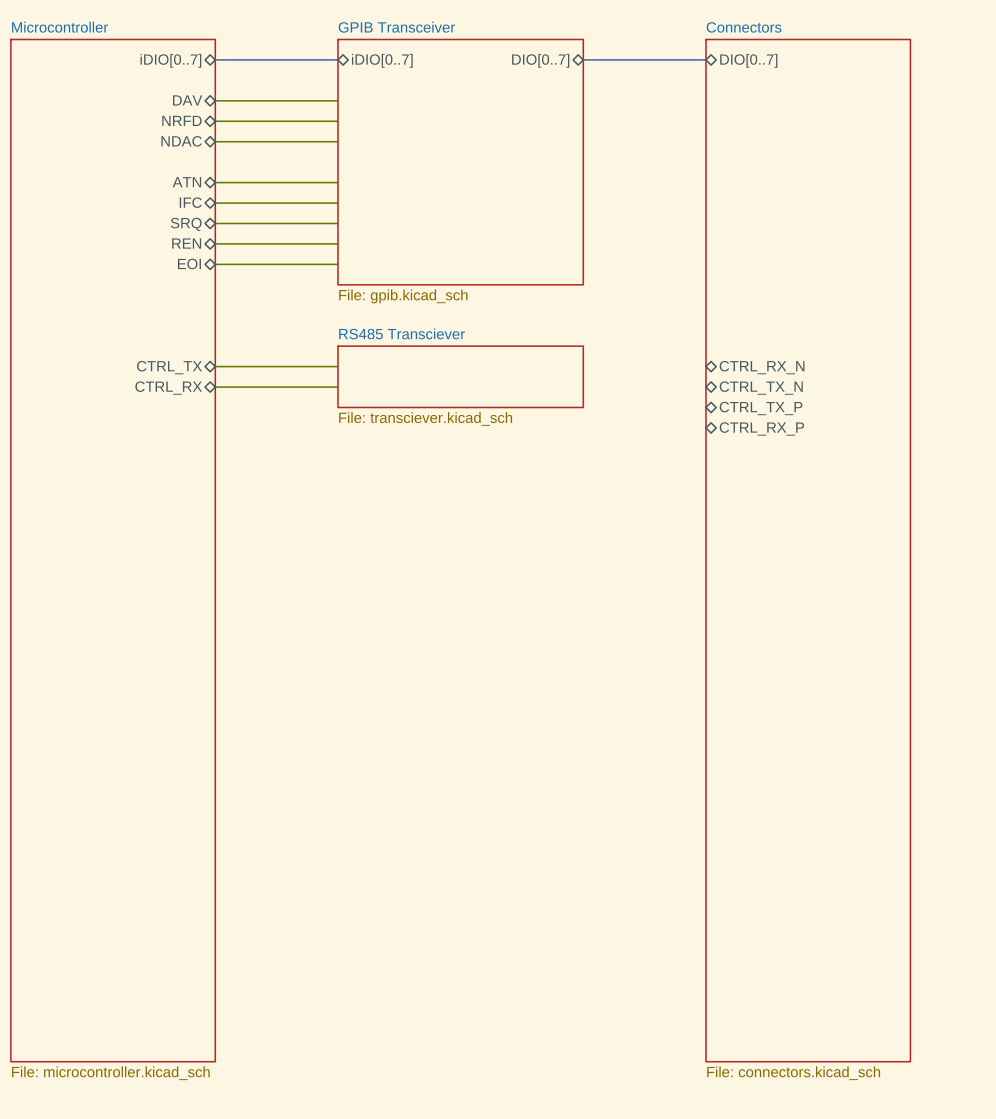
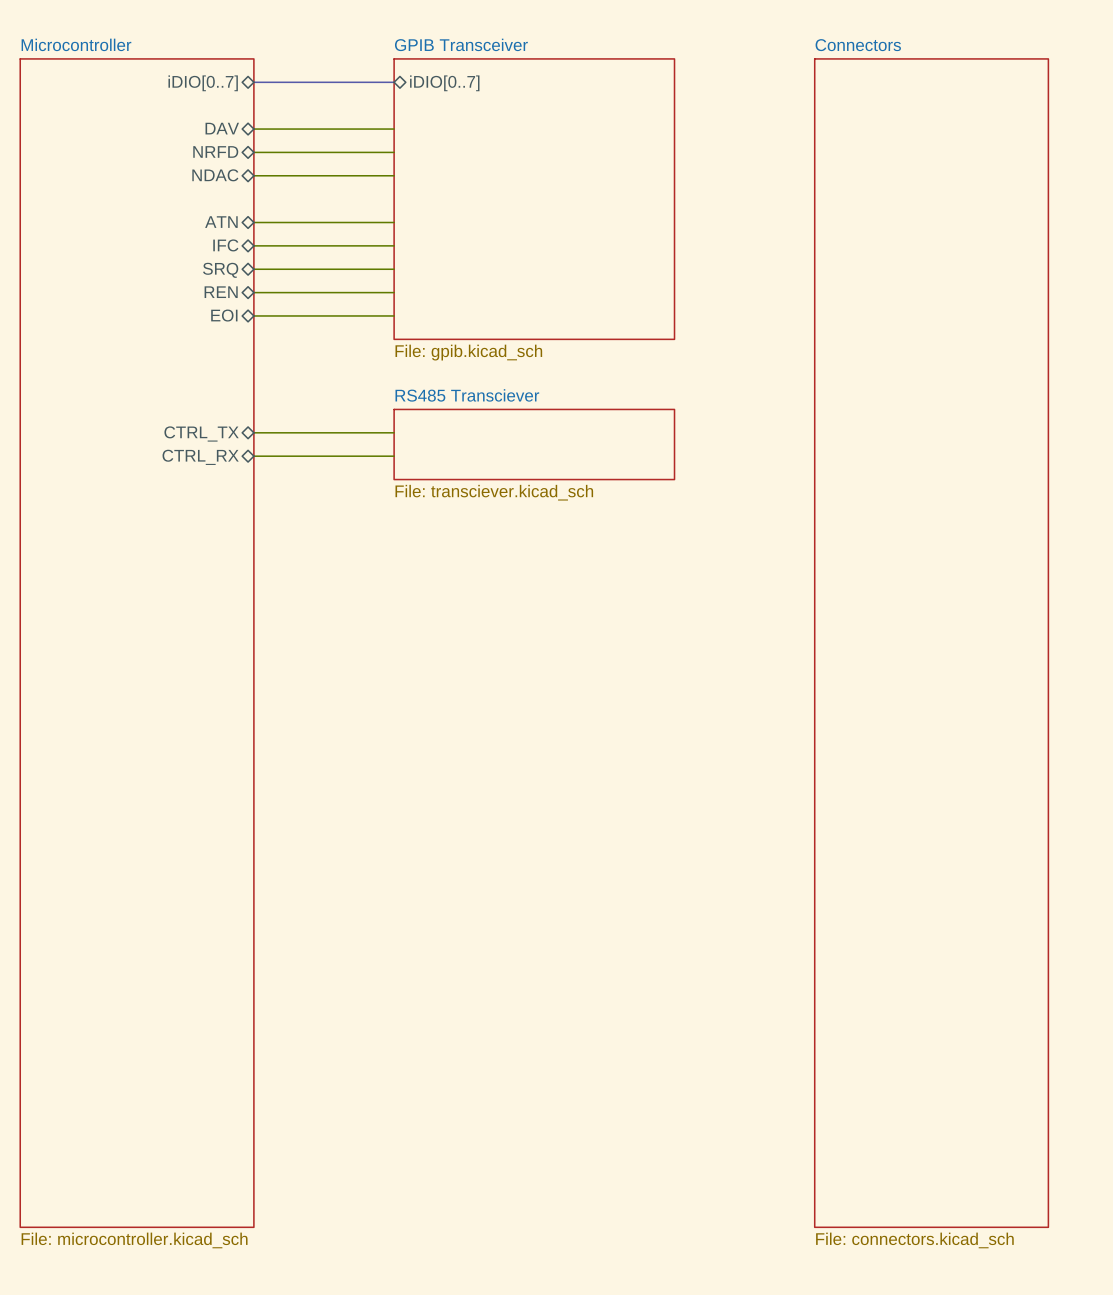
bus: (583, 59) (705, 59) -> none
sheet pin: DIO[0..7] (540, 60) -> none
sheet pin: DIO[0..7] (748, 60) -> none
sheet pin: CTRL_RX_N (762, 367) -> none
sheet pin: CTRL_TX_N (761, 388) -> none
sheet pin: CTRL_TX_P (761, 408) -> none
sheet pin: CTRL_RX_P (761, 428) -> none

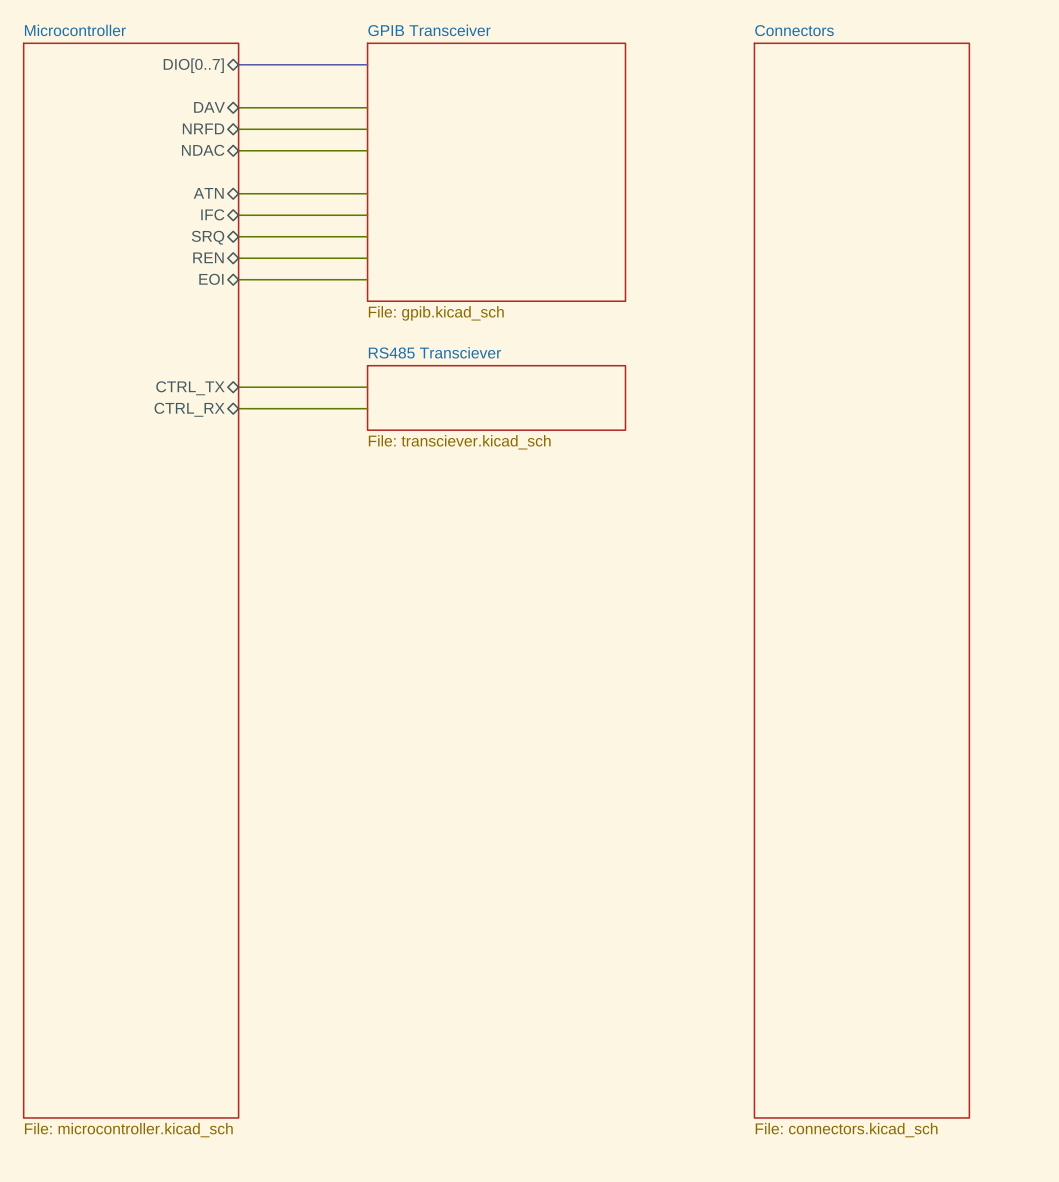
sheet pin: iDIO[0..7] (203, 83) -> DIO[0..7] (193, 65)
sheet pin: iDIO[0..7] (444, 83) -> none

